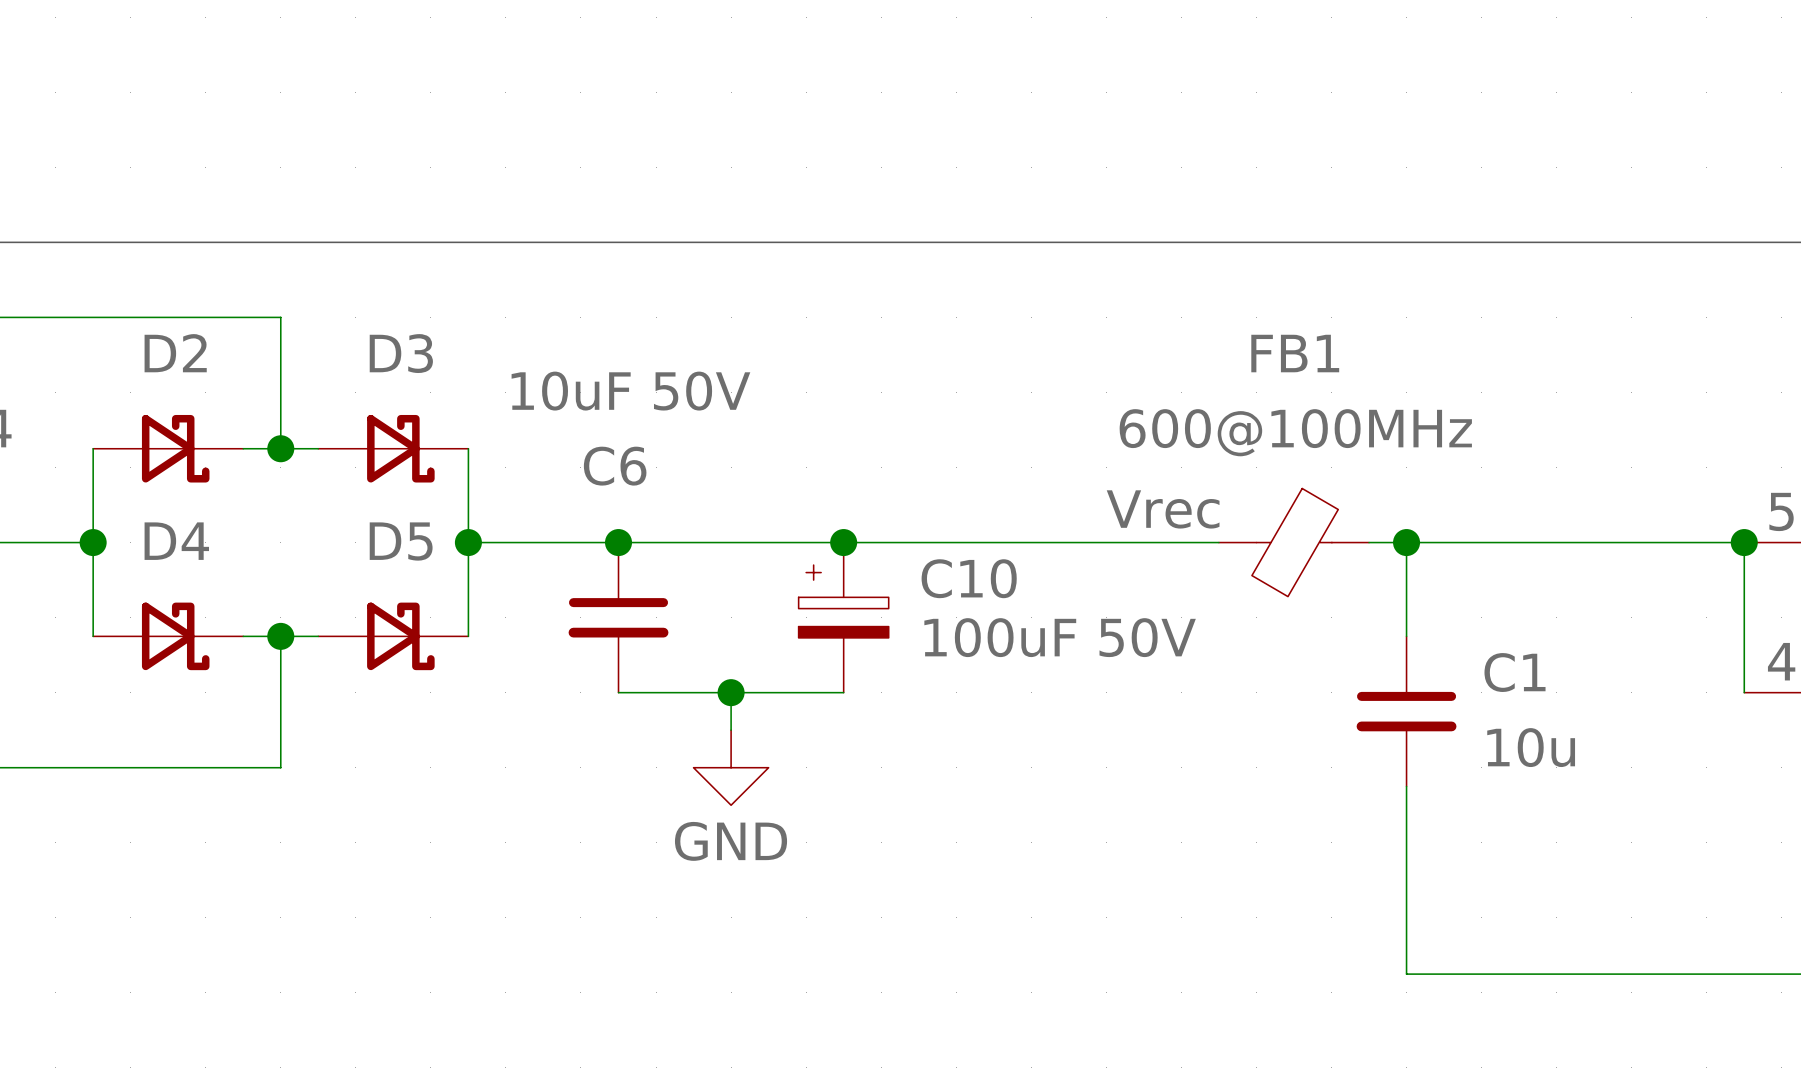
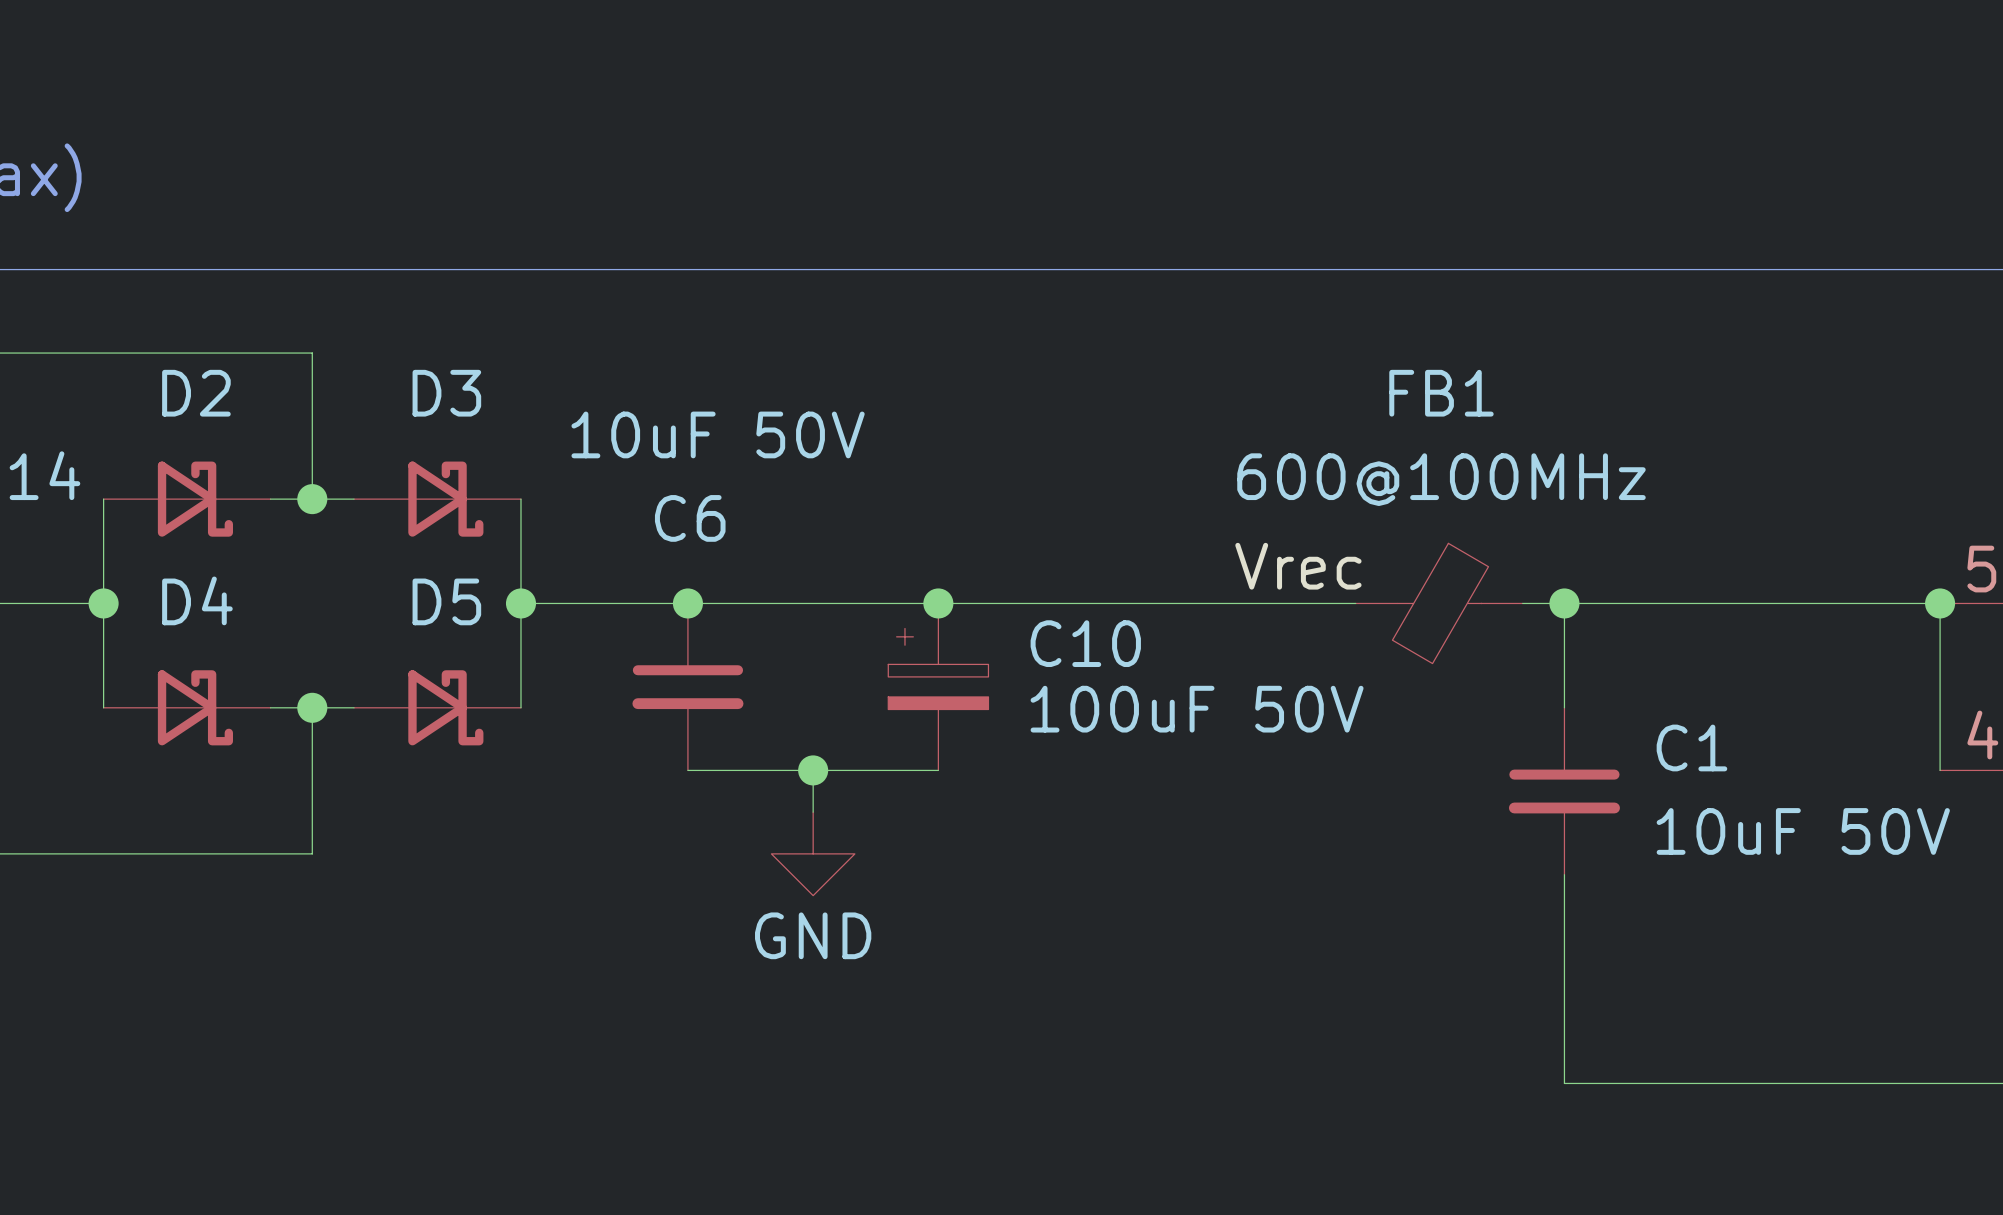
C1 value: 10u (1531, 747) -> 10uF 50V (1803, 831)

